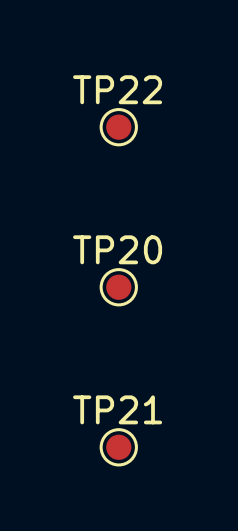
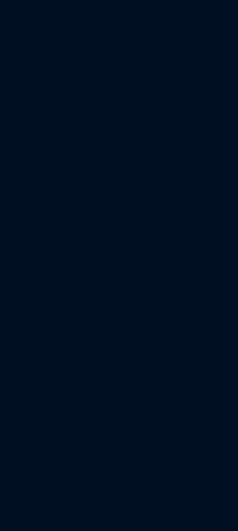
TP22: (118, 127) -> none
TP20: (118, 287) -> none
TP21: (118, 447) -> none

